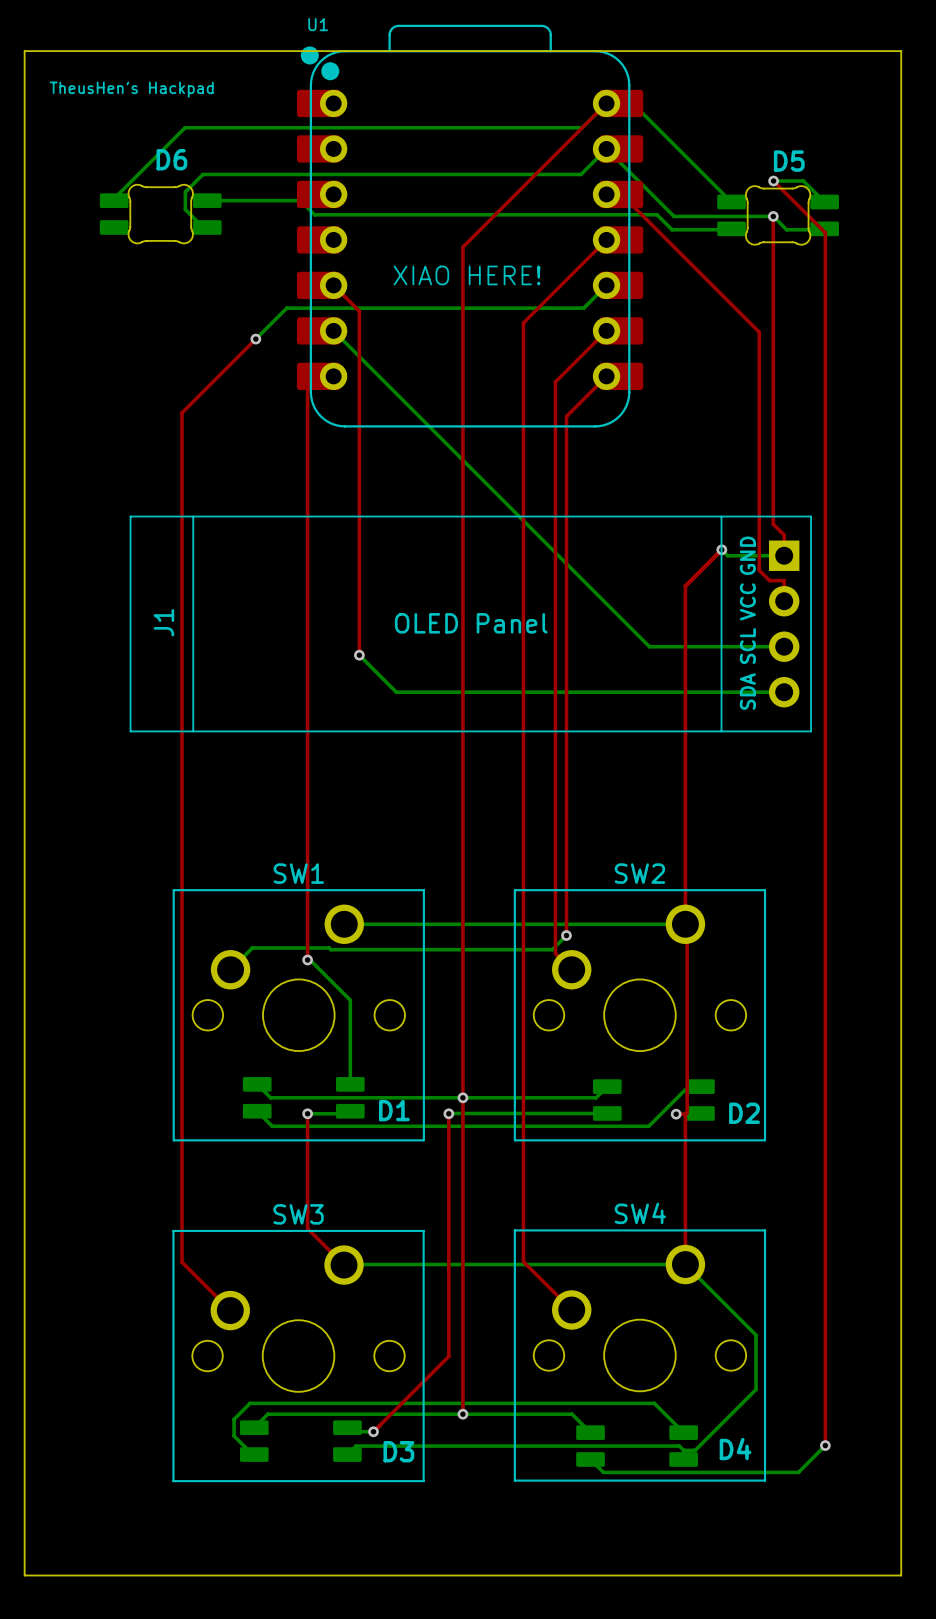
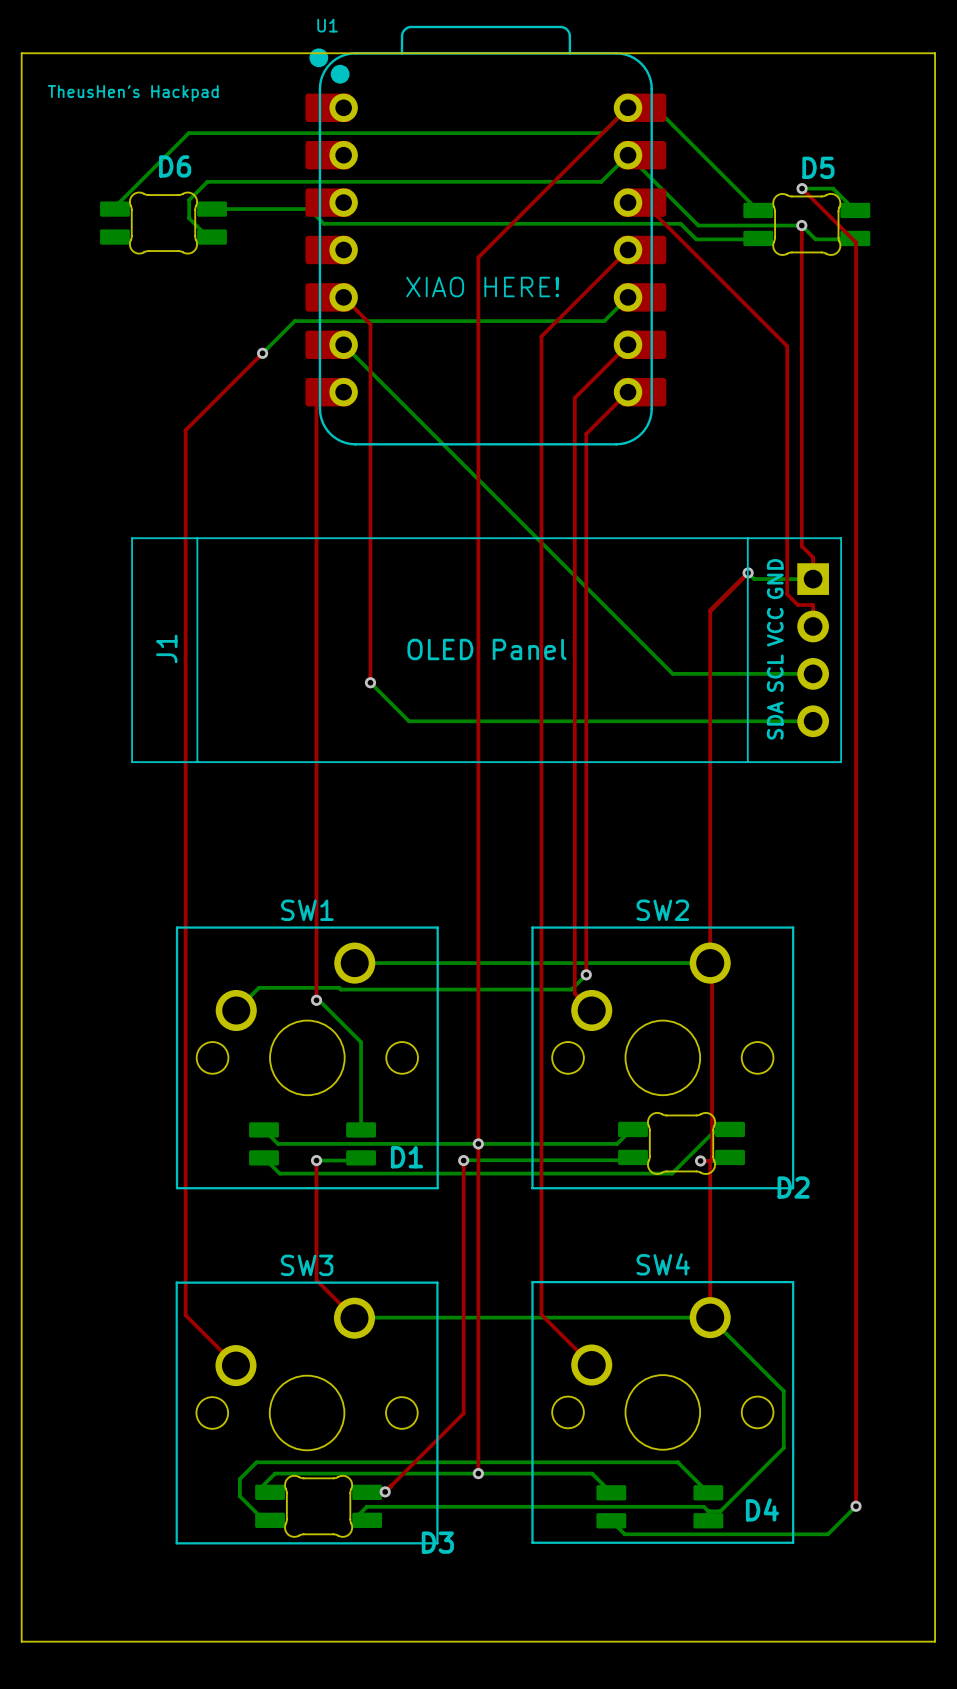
D2 footprint: [592, 1079, 715, 1121] -> [618, 1111, 745, 1175]
D3 footprint: [239, 1420, 362, 1462] -> [255, 1474, 383, 1538]

